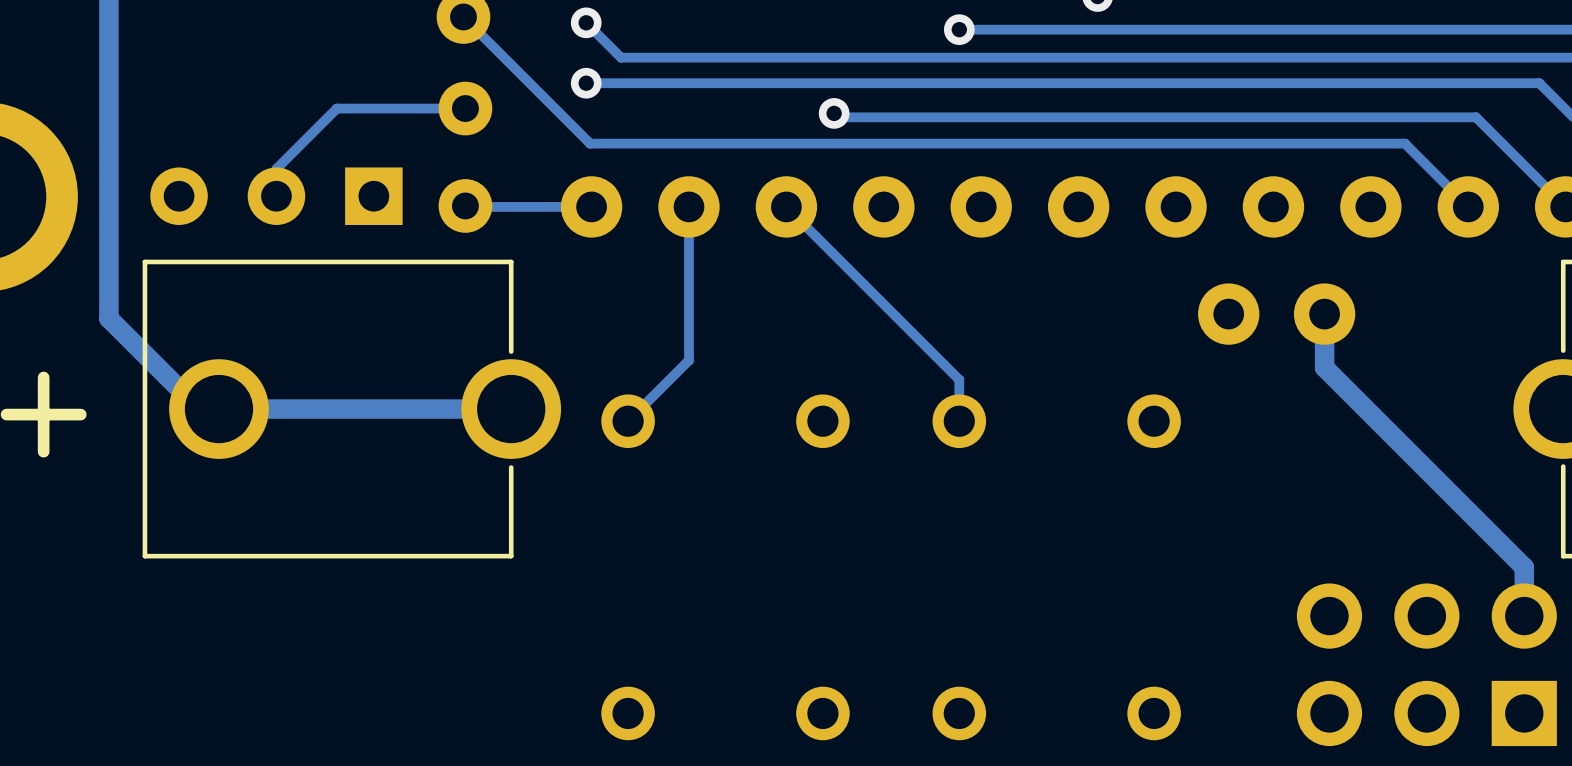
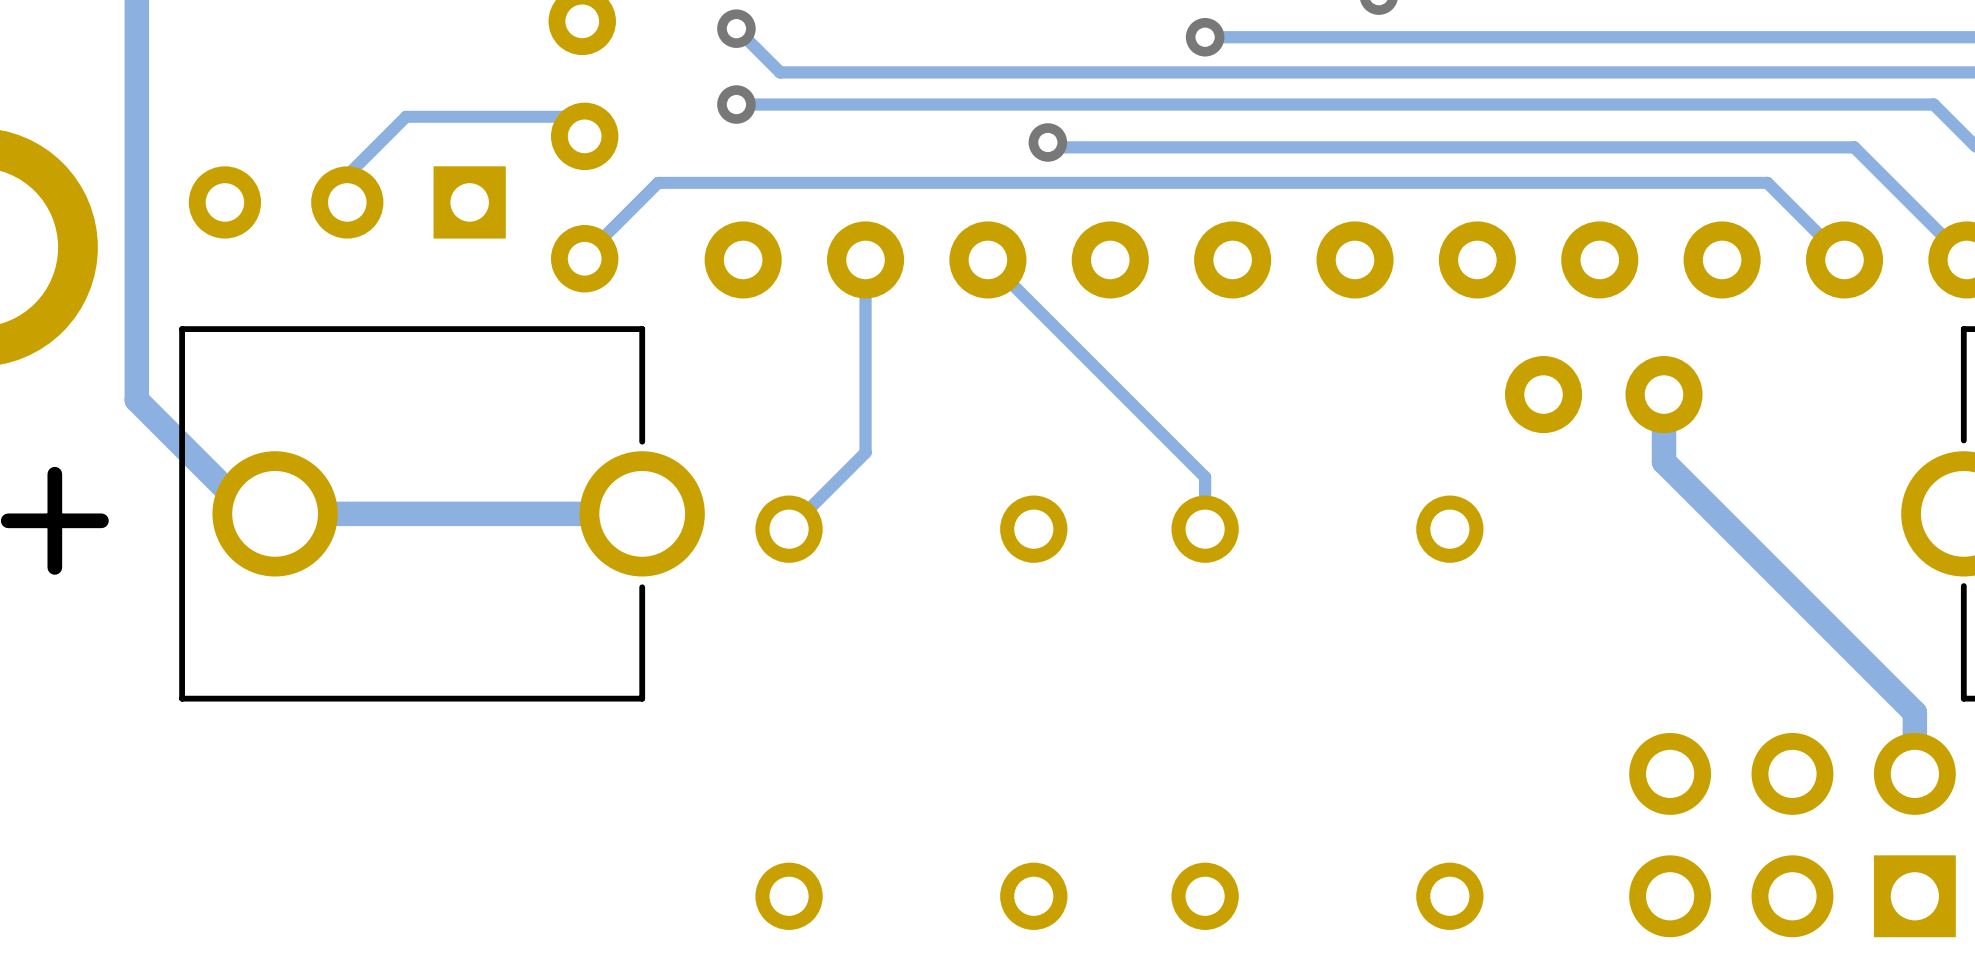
track: (463, 16) (590, 143) (1404, 143) (1406, 145) -> (582, 258) (658, 182) (1767, 182)
track: none -> (582, 136) (562, 116) (406, 116) (347, 175) (347, 202)
track: (465, 108) (336, 108) (276, 168) (276, 196) -> none
part position: (276, 196) -> (347, 202)
track: (465, 205) (591, 206) -> none

